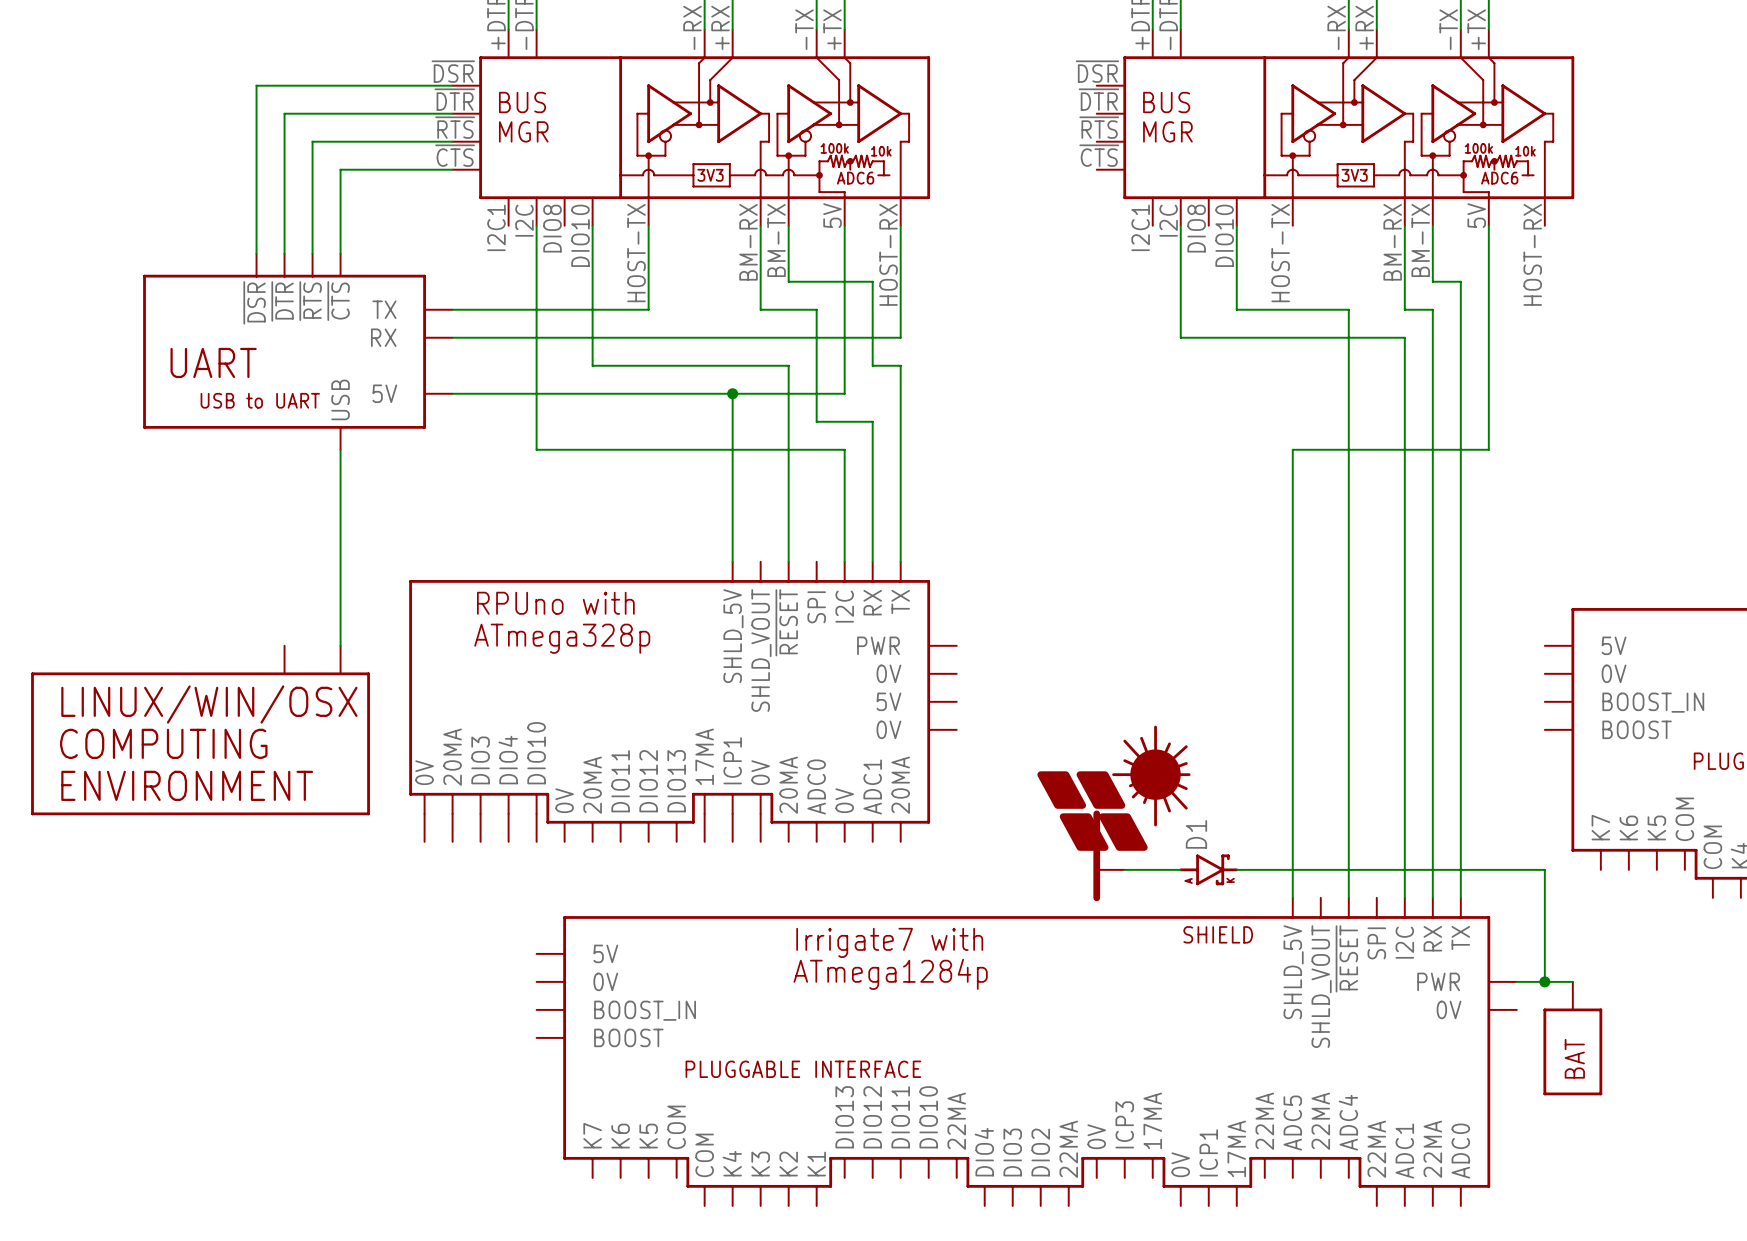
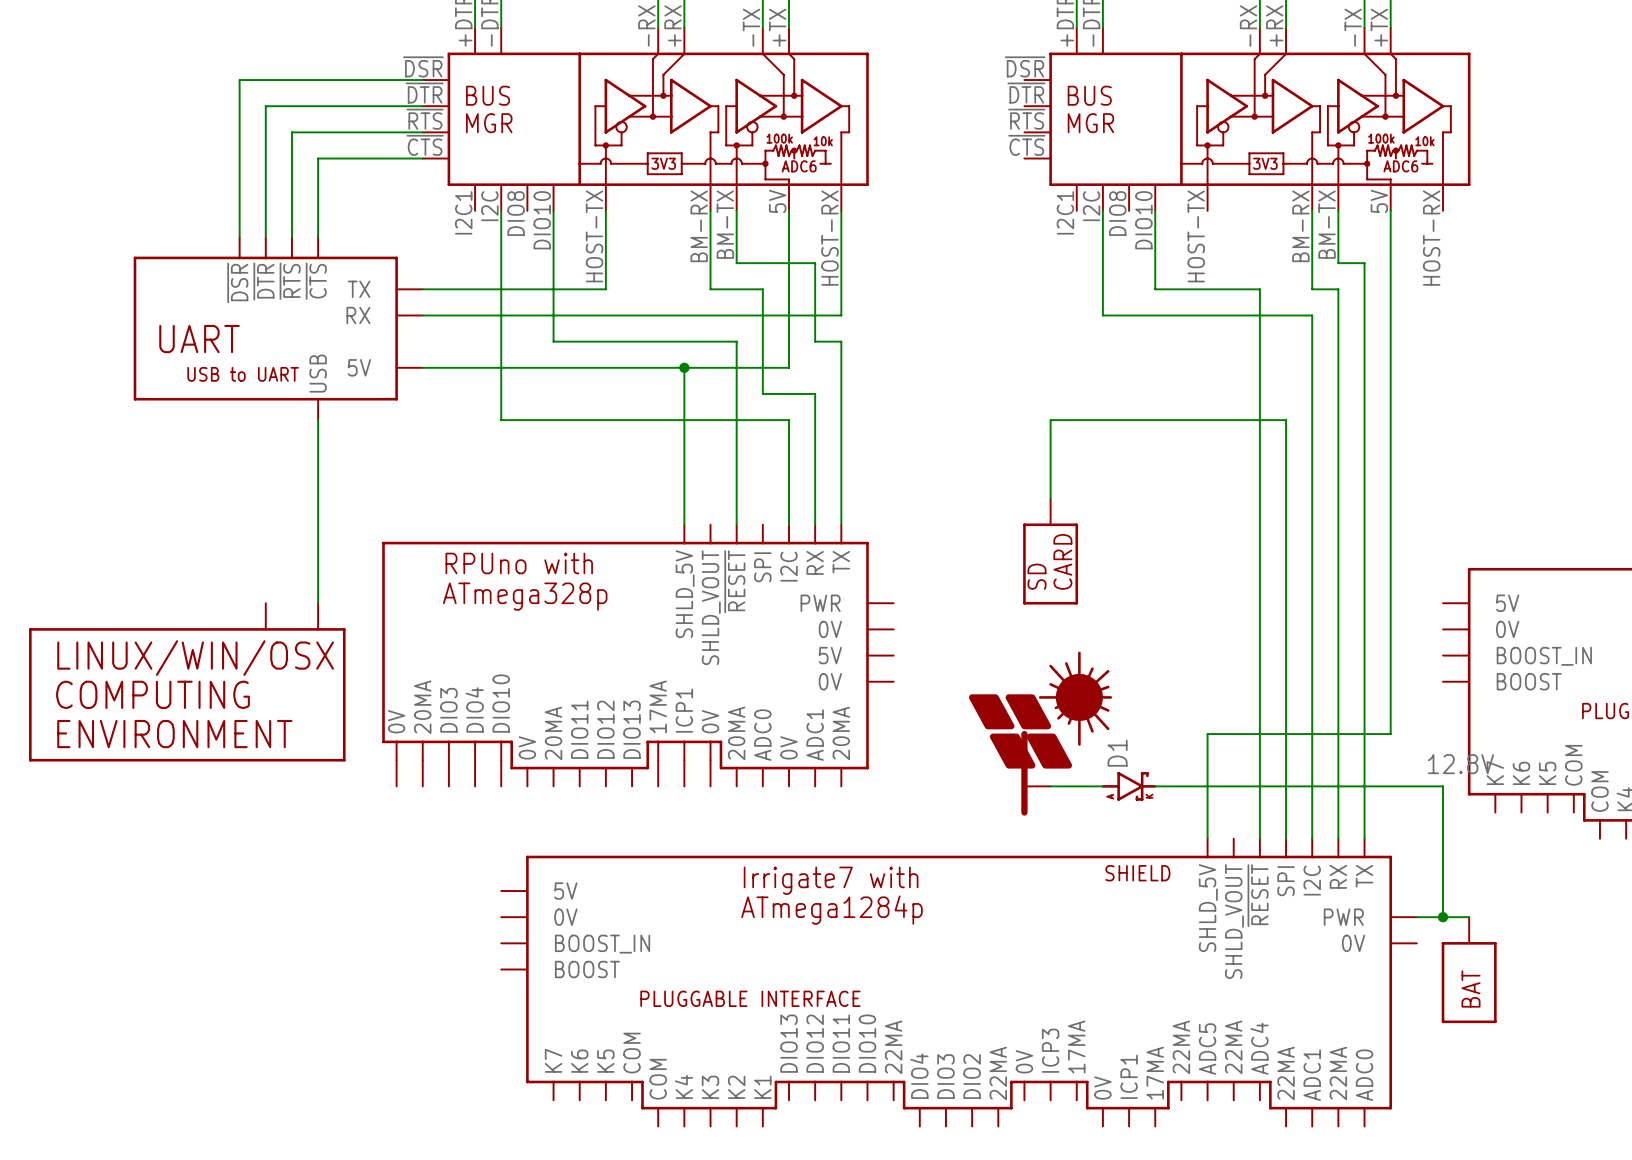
wire: (1292, 449) (1292, 785) -> (1390, 420) (1390, 734) (1207, 734)
wire: none -> (1207, 420) (1050, 420) (1050, 498)
wire: (1376, 449) (1488, 449) -> (1286, 420) (1286, 838)
part: none -> (1050, 551)
part position: (1113, 813) -> (1040, 733)
label: none -> 12.8V (1460, 764)
wire: (1124, 869) (1180, 869) -> (1050, 786) (1102, 786)
D1 position: (1208, 869) -> (1129, 786)
wire: (1236, 869) (1544, 869) -> (1155, 786) (1443, 786) (1443, 812)

